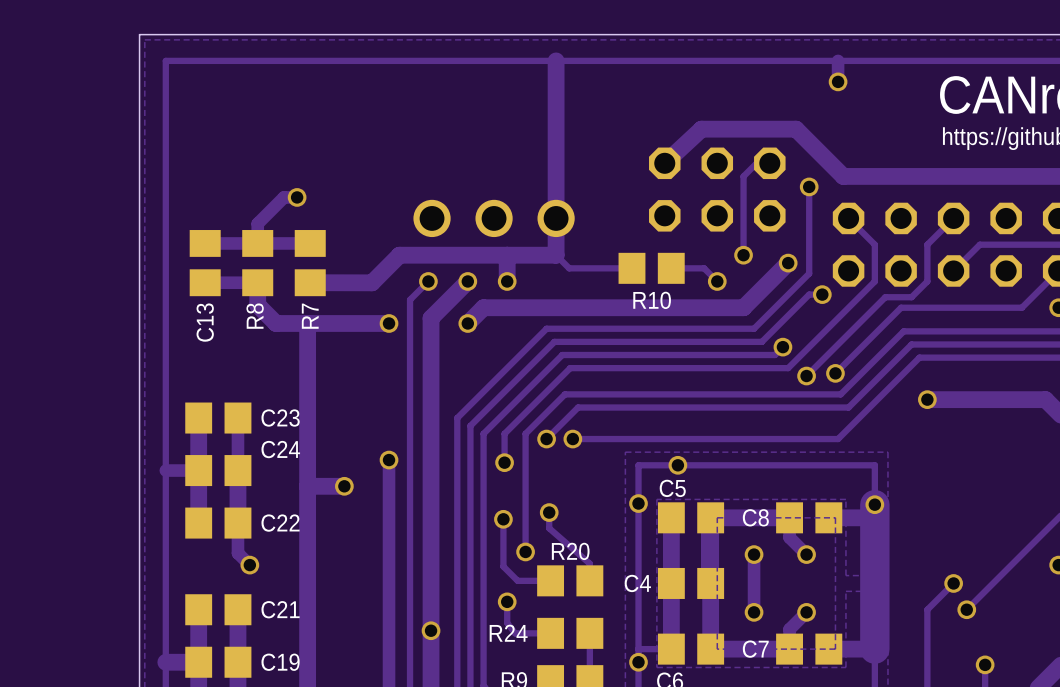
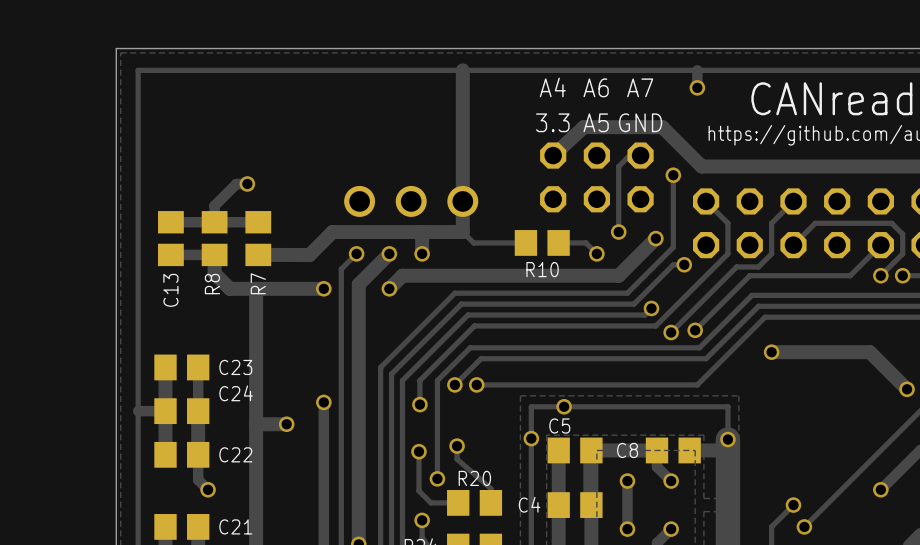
text: none -> A4 (552, 87)
text: none -> A6 (596, 87)
text: none -> A7 (640, 87)
text: none -> 3.3 (552, 122)
text: none -> GND (640, 122)
text: none -> A5 (596, 122)

